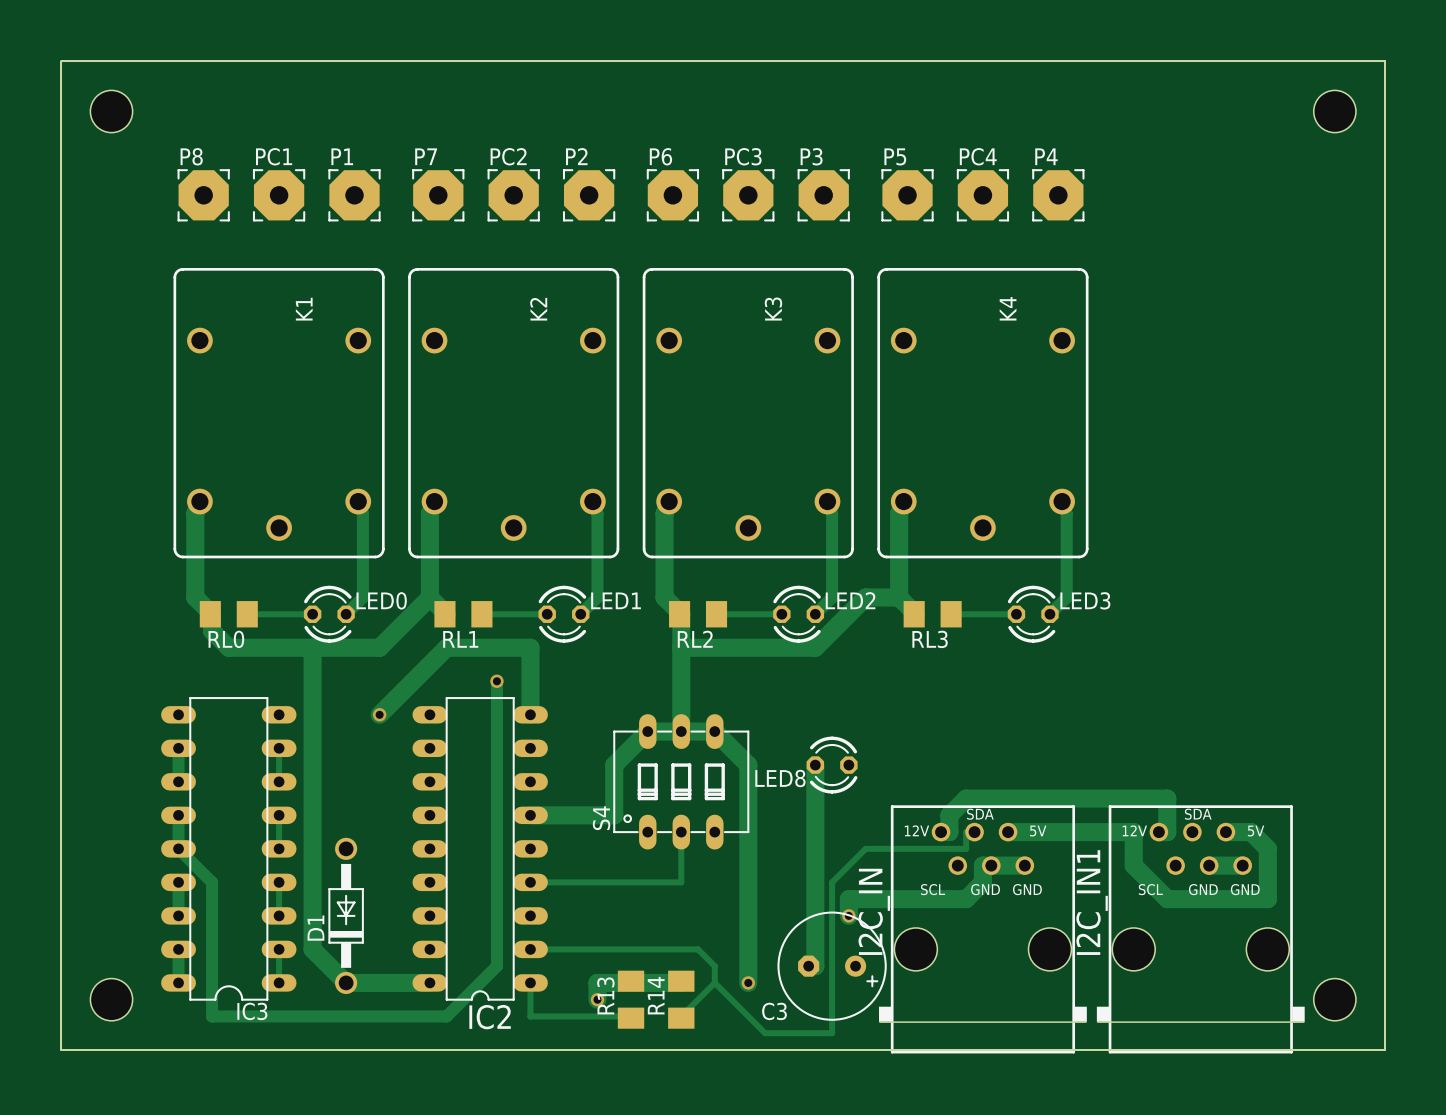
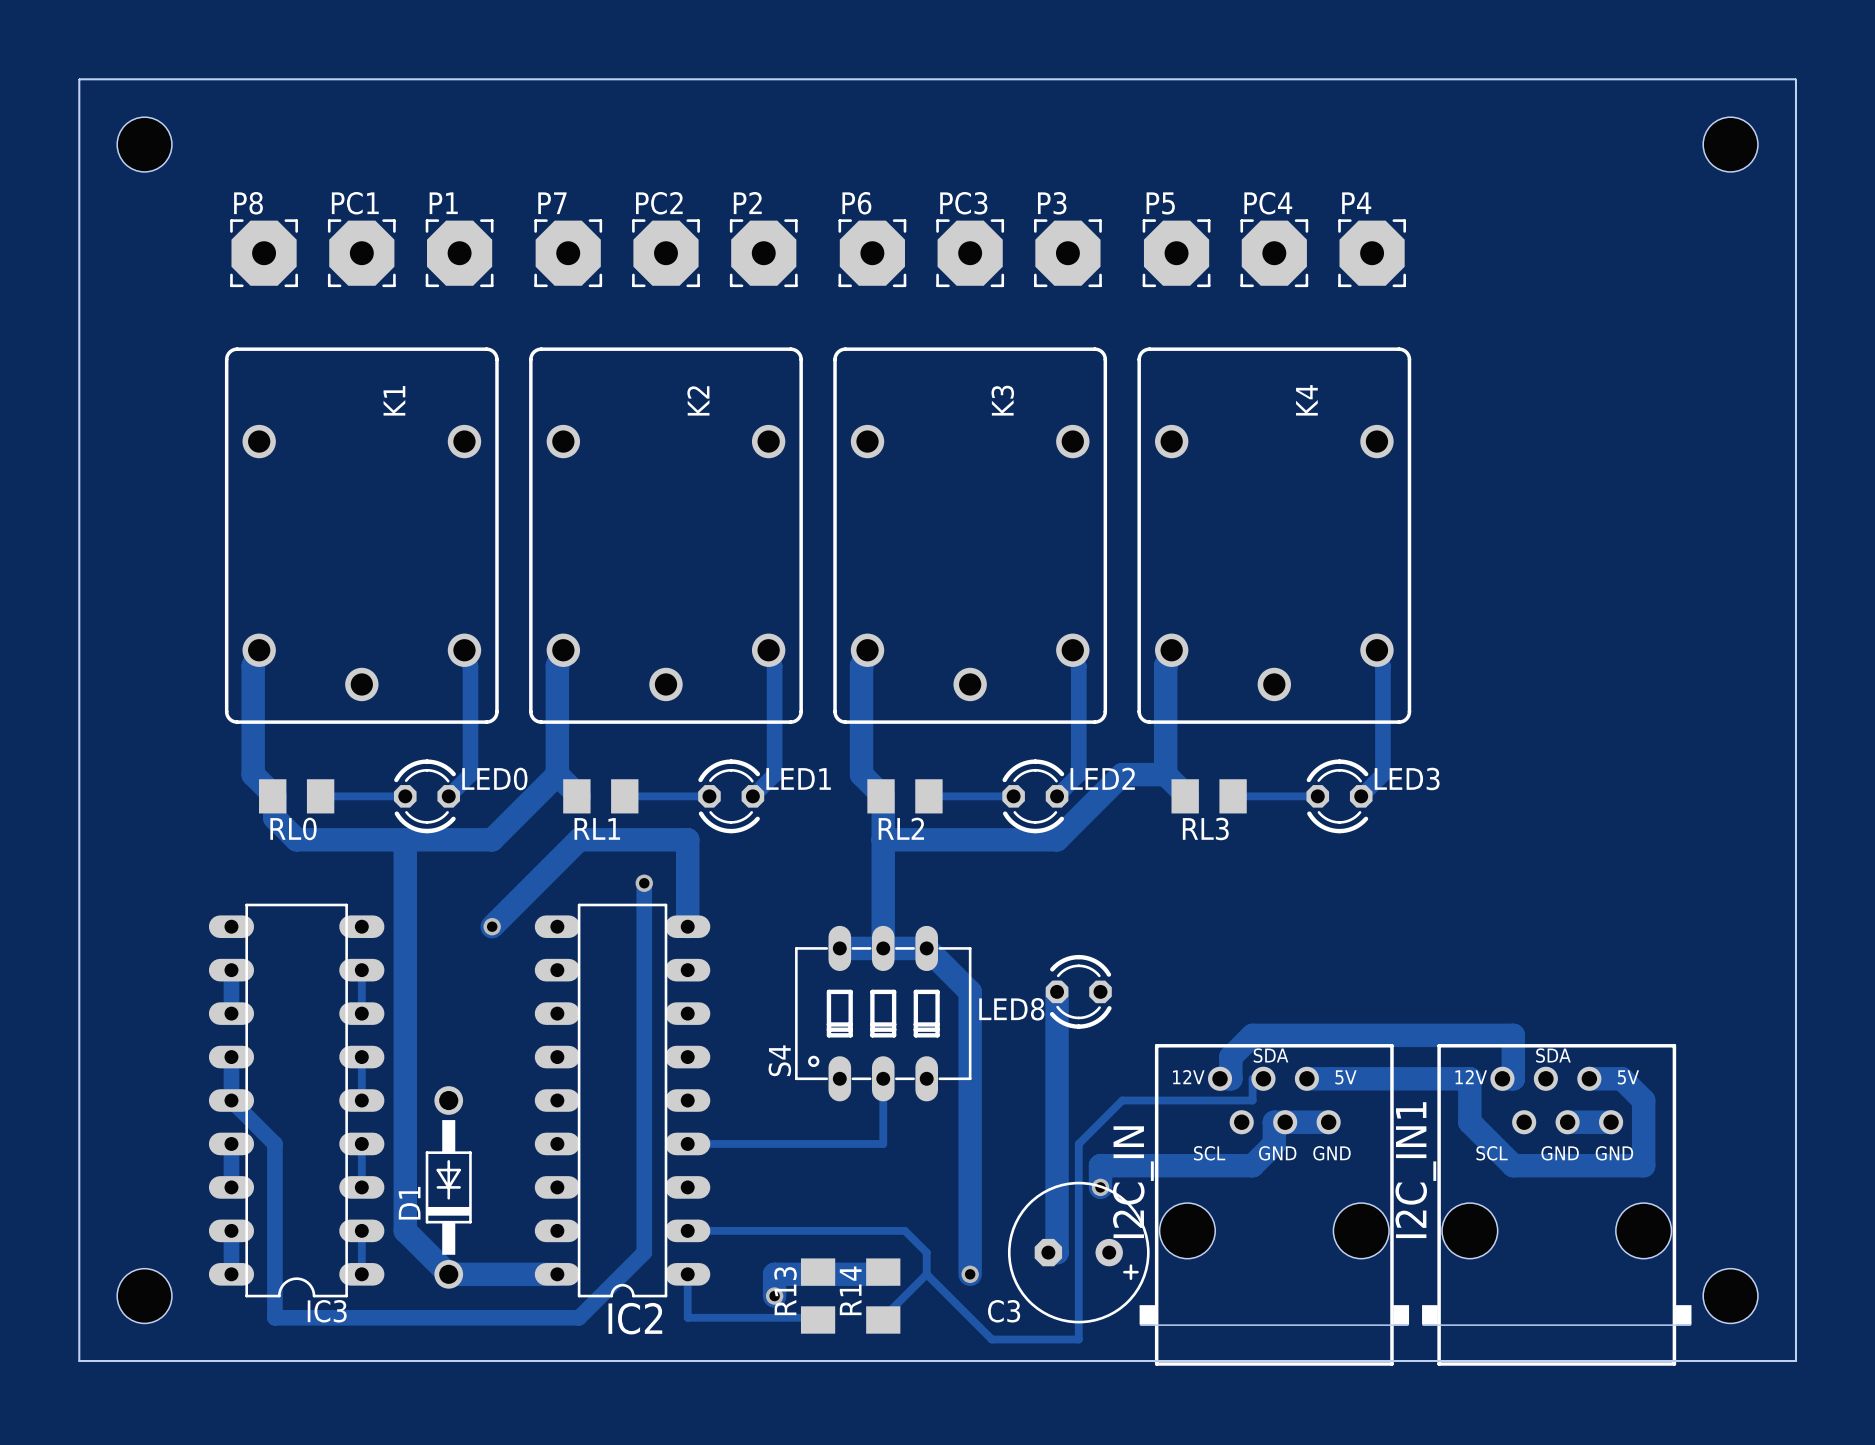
track: (647, 731) (614, 765) (614, 815) (530, 815) -> none

